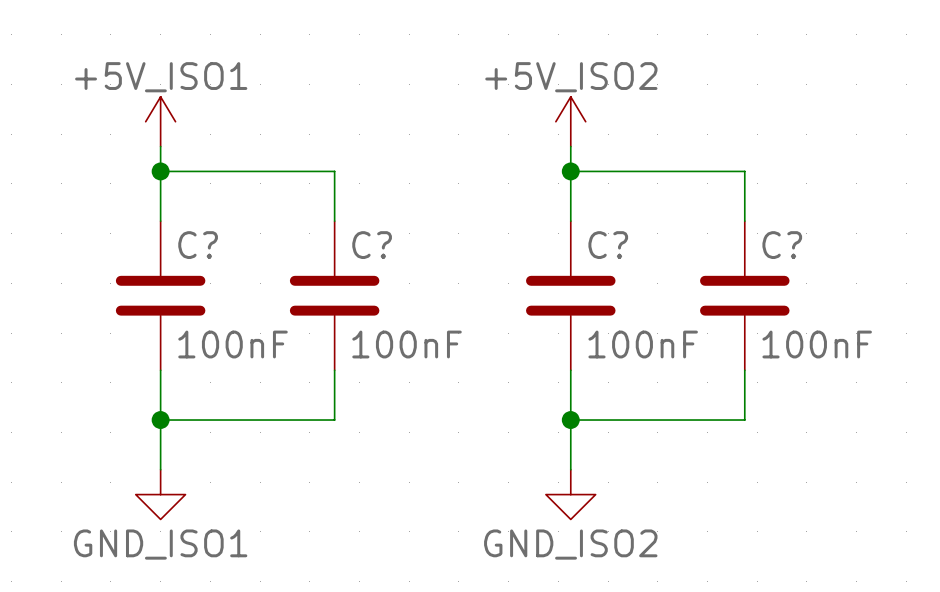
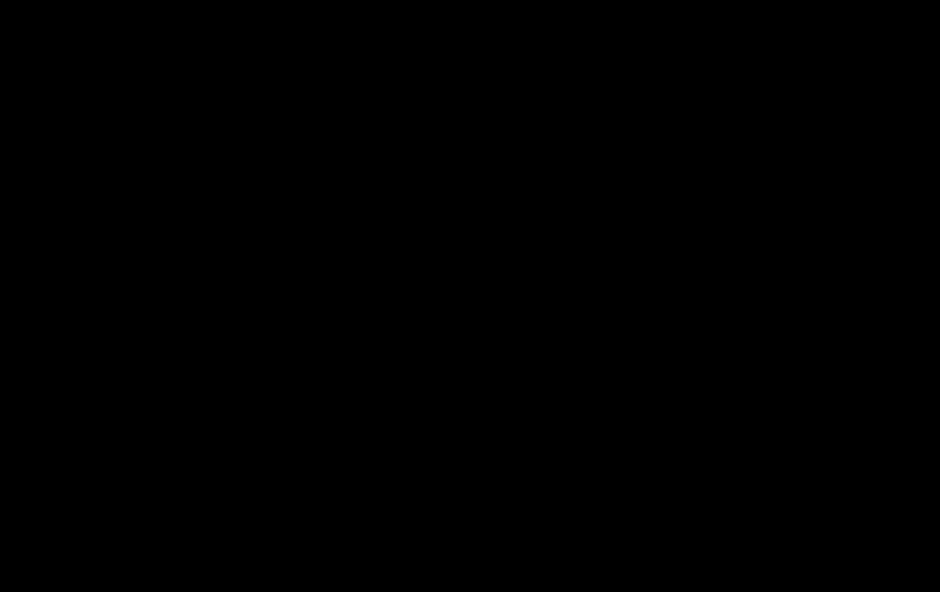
power symbol: +5V_ISO1 (160, 121) -> none
power symbol: +5V_ISO2 (570, 121) -> none
wire: (160, 146) (160, 221) -> none
wire: (570, 146) (570, 221) -> none
wire: (160, 171) (334, 171) (334, 221) -> none
junction: (160, 171) -> none
wire: (570, 171) (744, 171) (744, 221) -> none
junction: (570, 171) -> none
C?: 100nF (160, 295) -> none
C?: 100nF (334, 295) -> none
C?: 100nF (570, 295) -> none
C?: 100nF (744, 295) -> none
wire: (160, 370) (160, 469) -> none
wire: (334, 370) (334, 420) (160, 420) -> none
wire: (570, 370) (570, 469) -> none
wire: (744, 370) (744, 420) (570, 420) -> none
junction: (160, 420) -> none
junction: (570, 420) -> none
power symbol: GND_ISO1 (160, 494) -> none
power symbol: GND_ISO2 (570, 494) -> none

